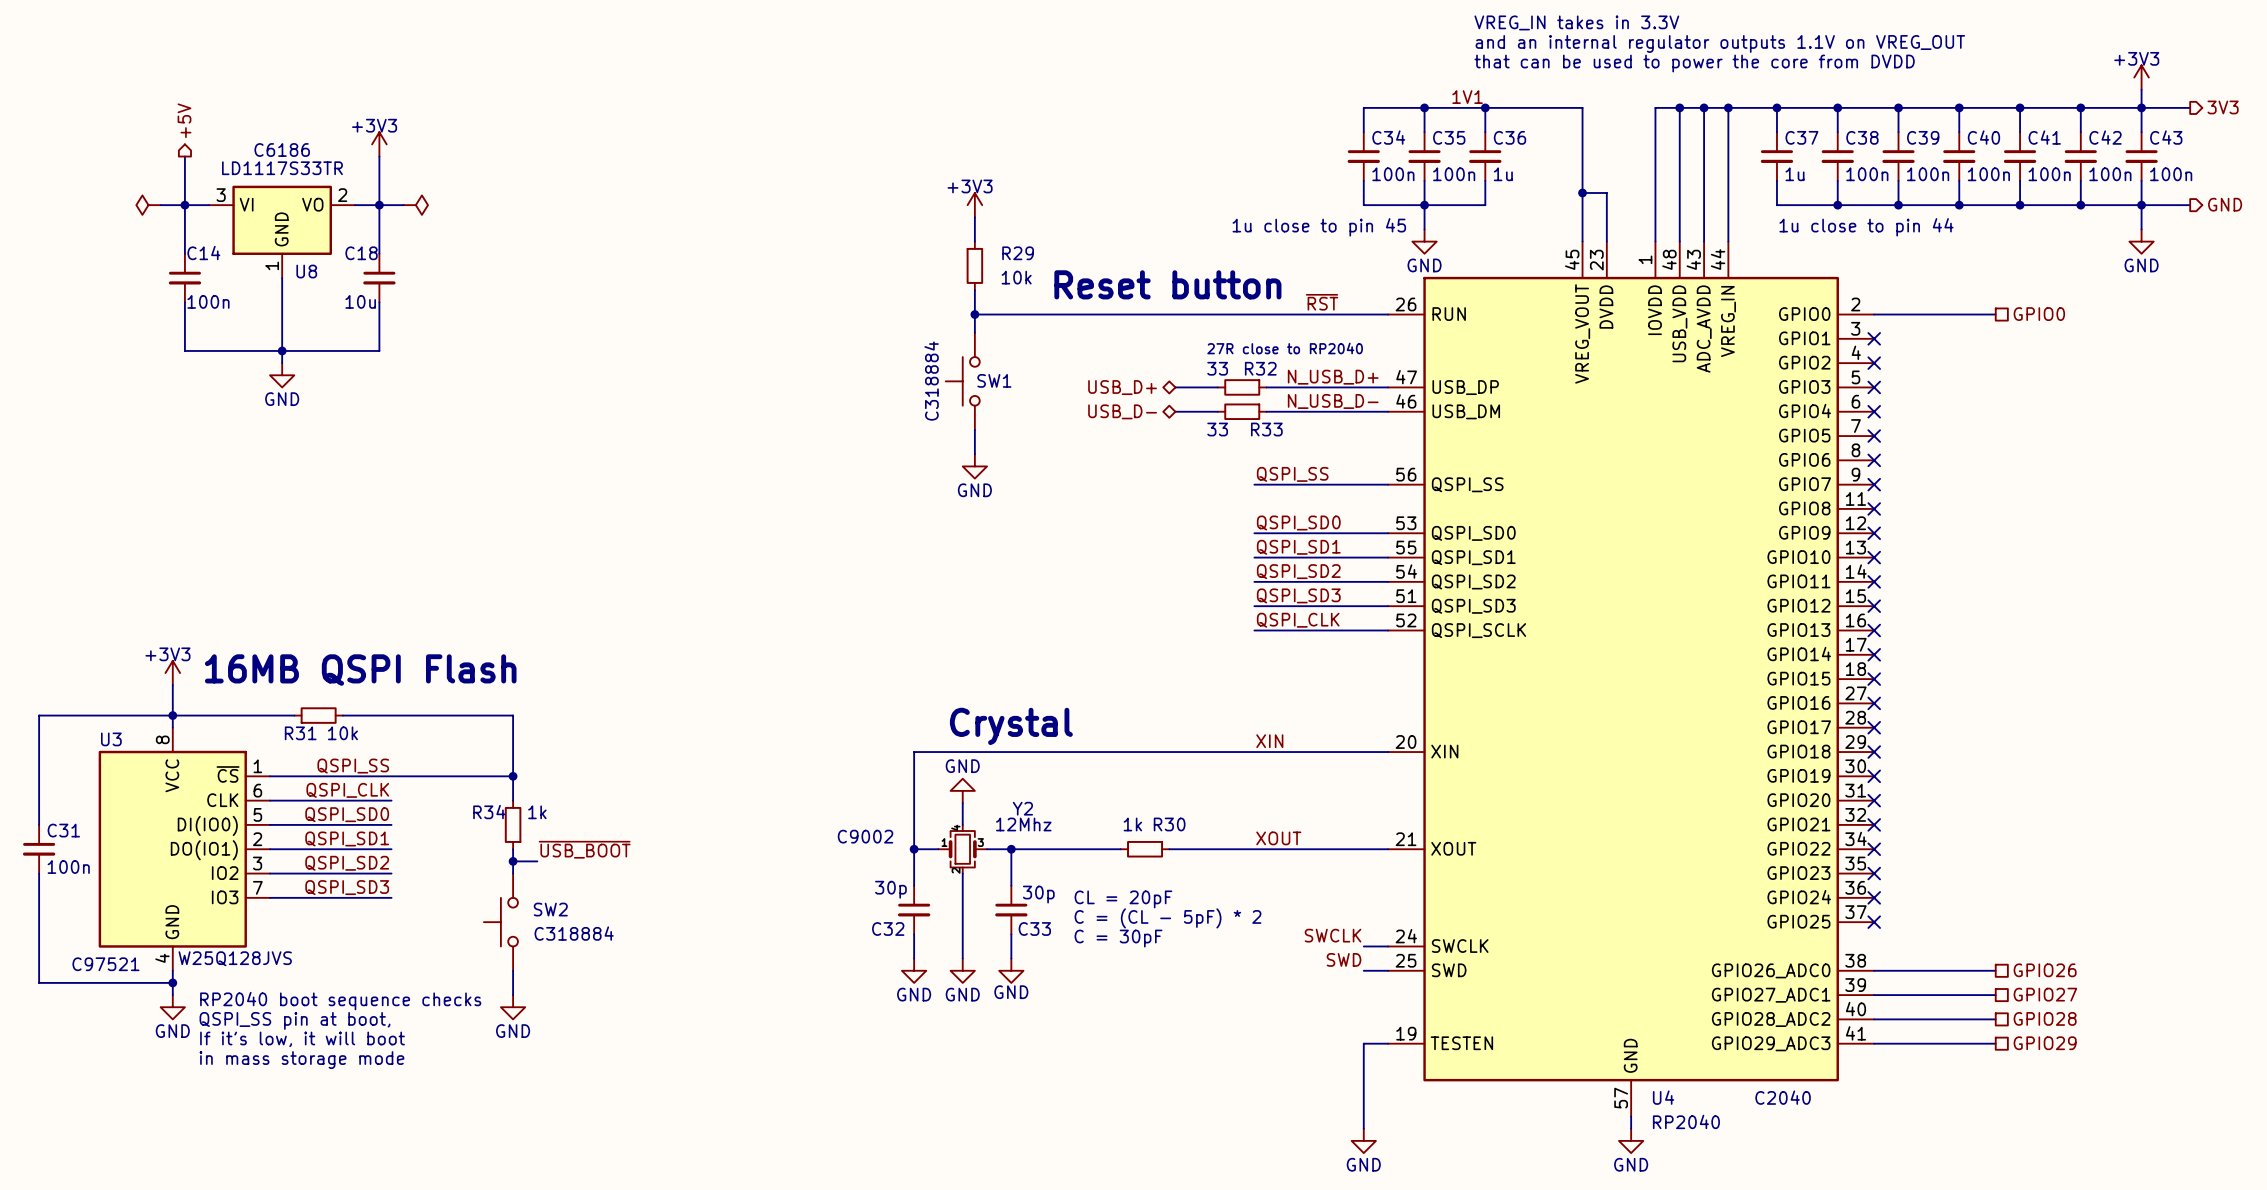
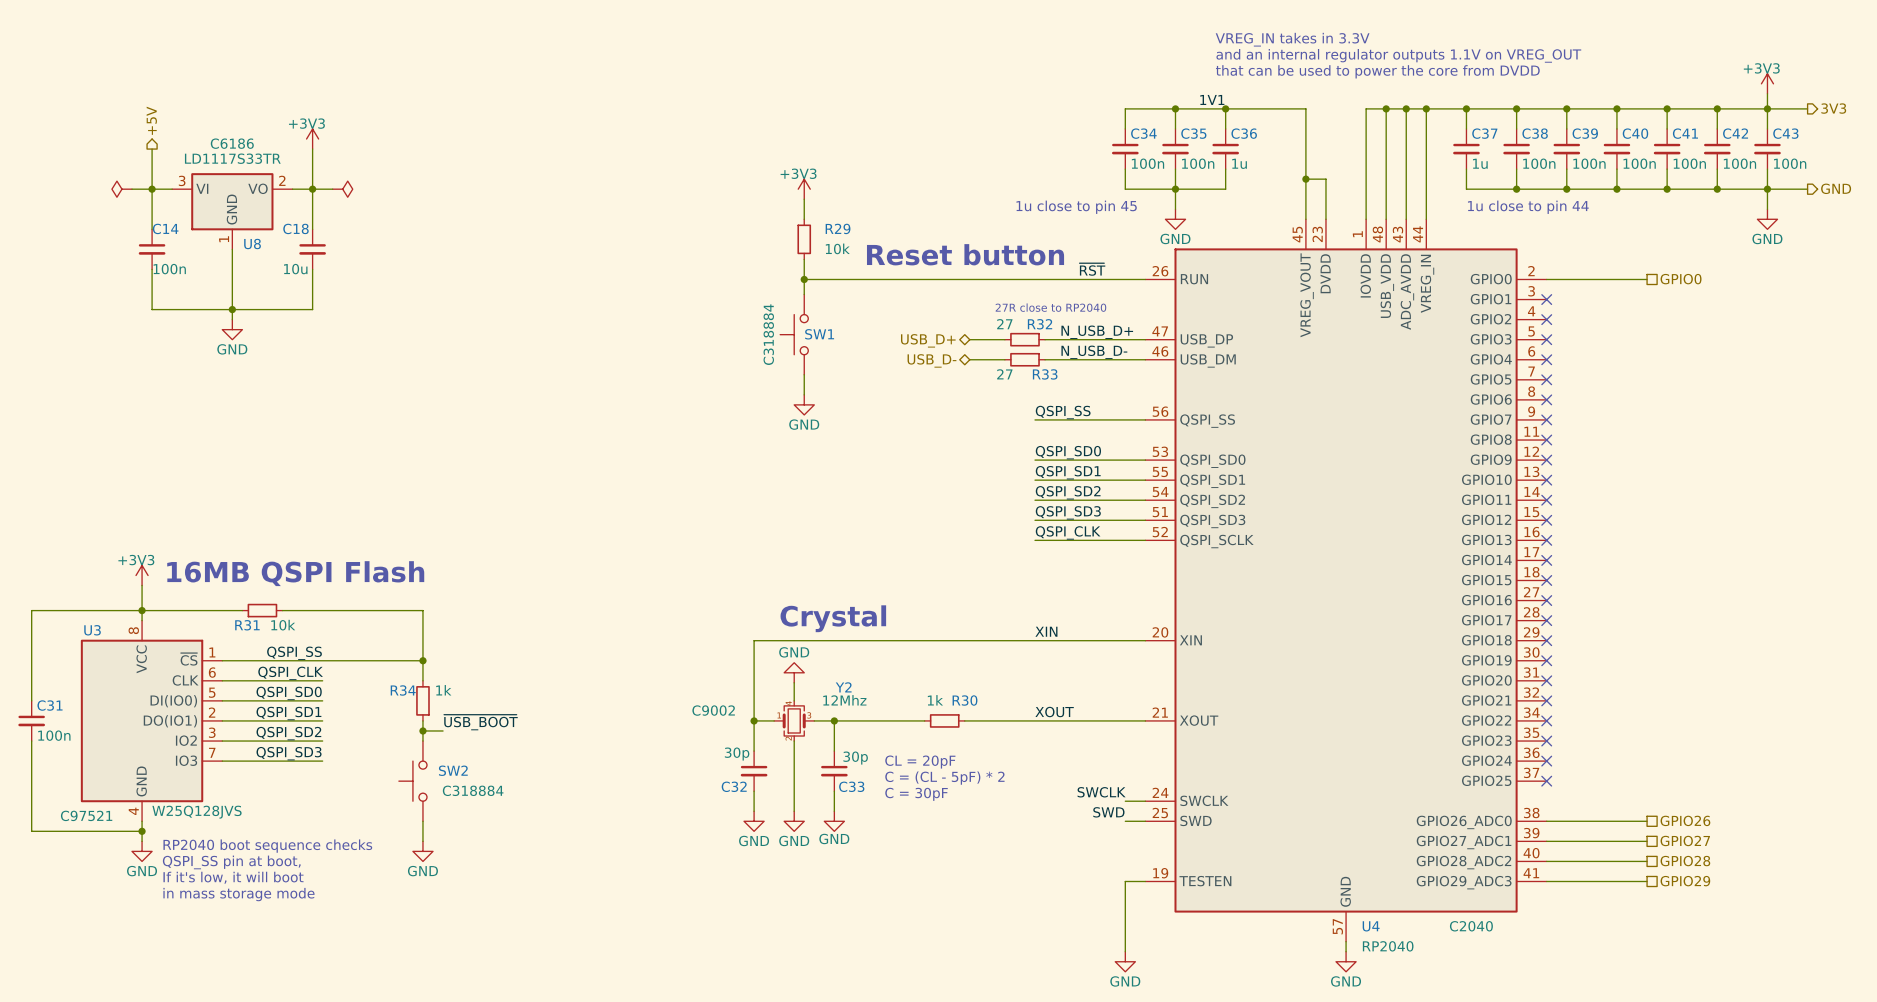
R32 value: 33 (1217, 368) -> 27 (1004, 324)
R33 value: 33 (1217, 429) -> 27 (1004, 374)

